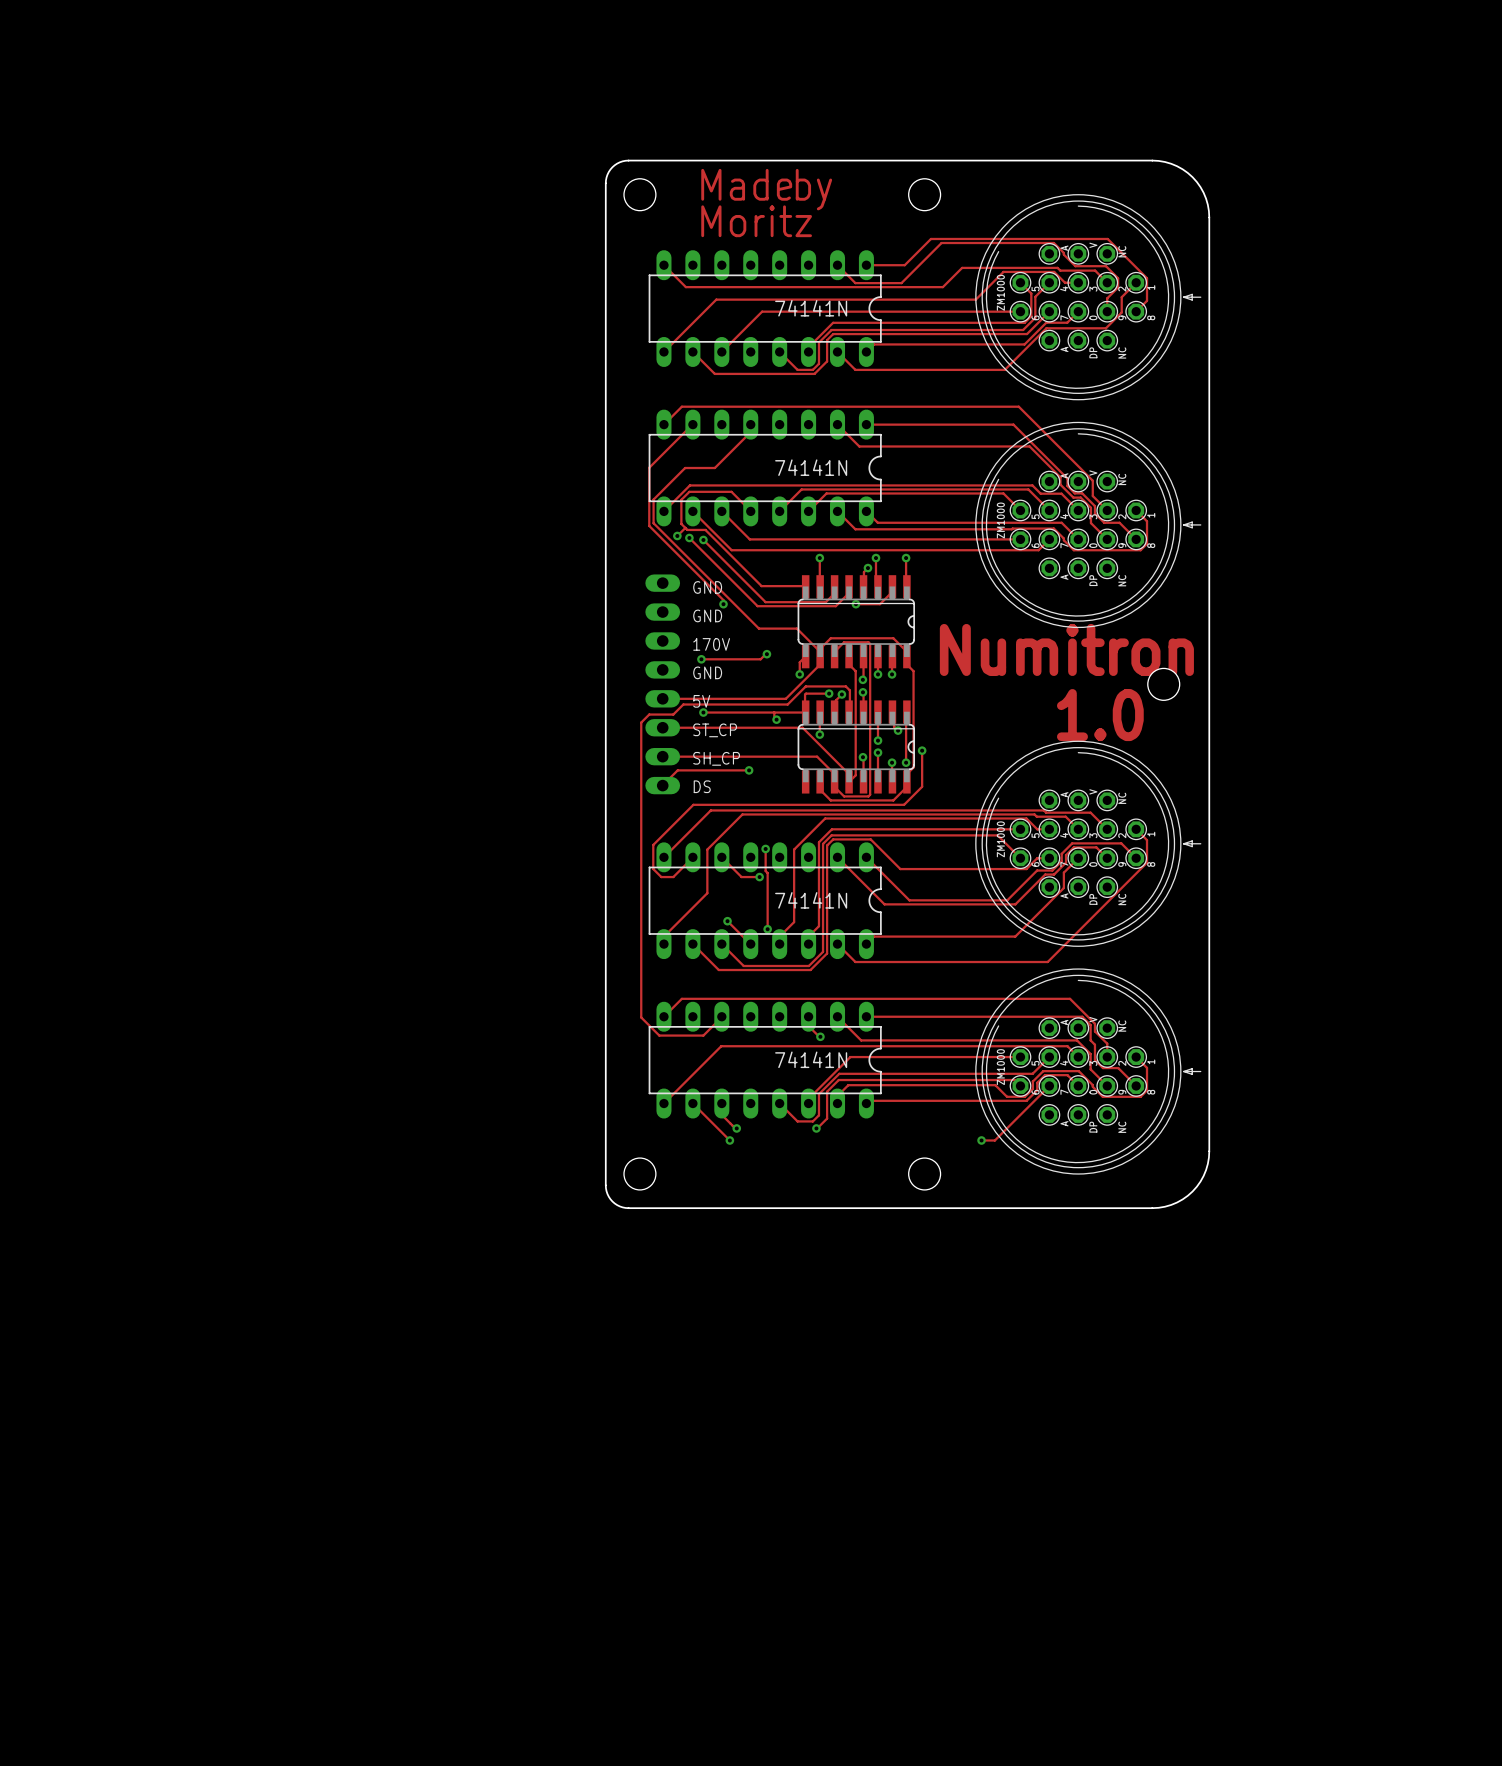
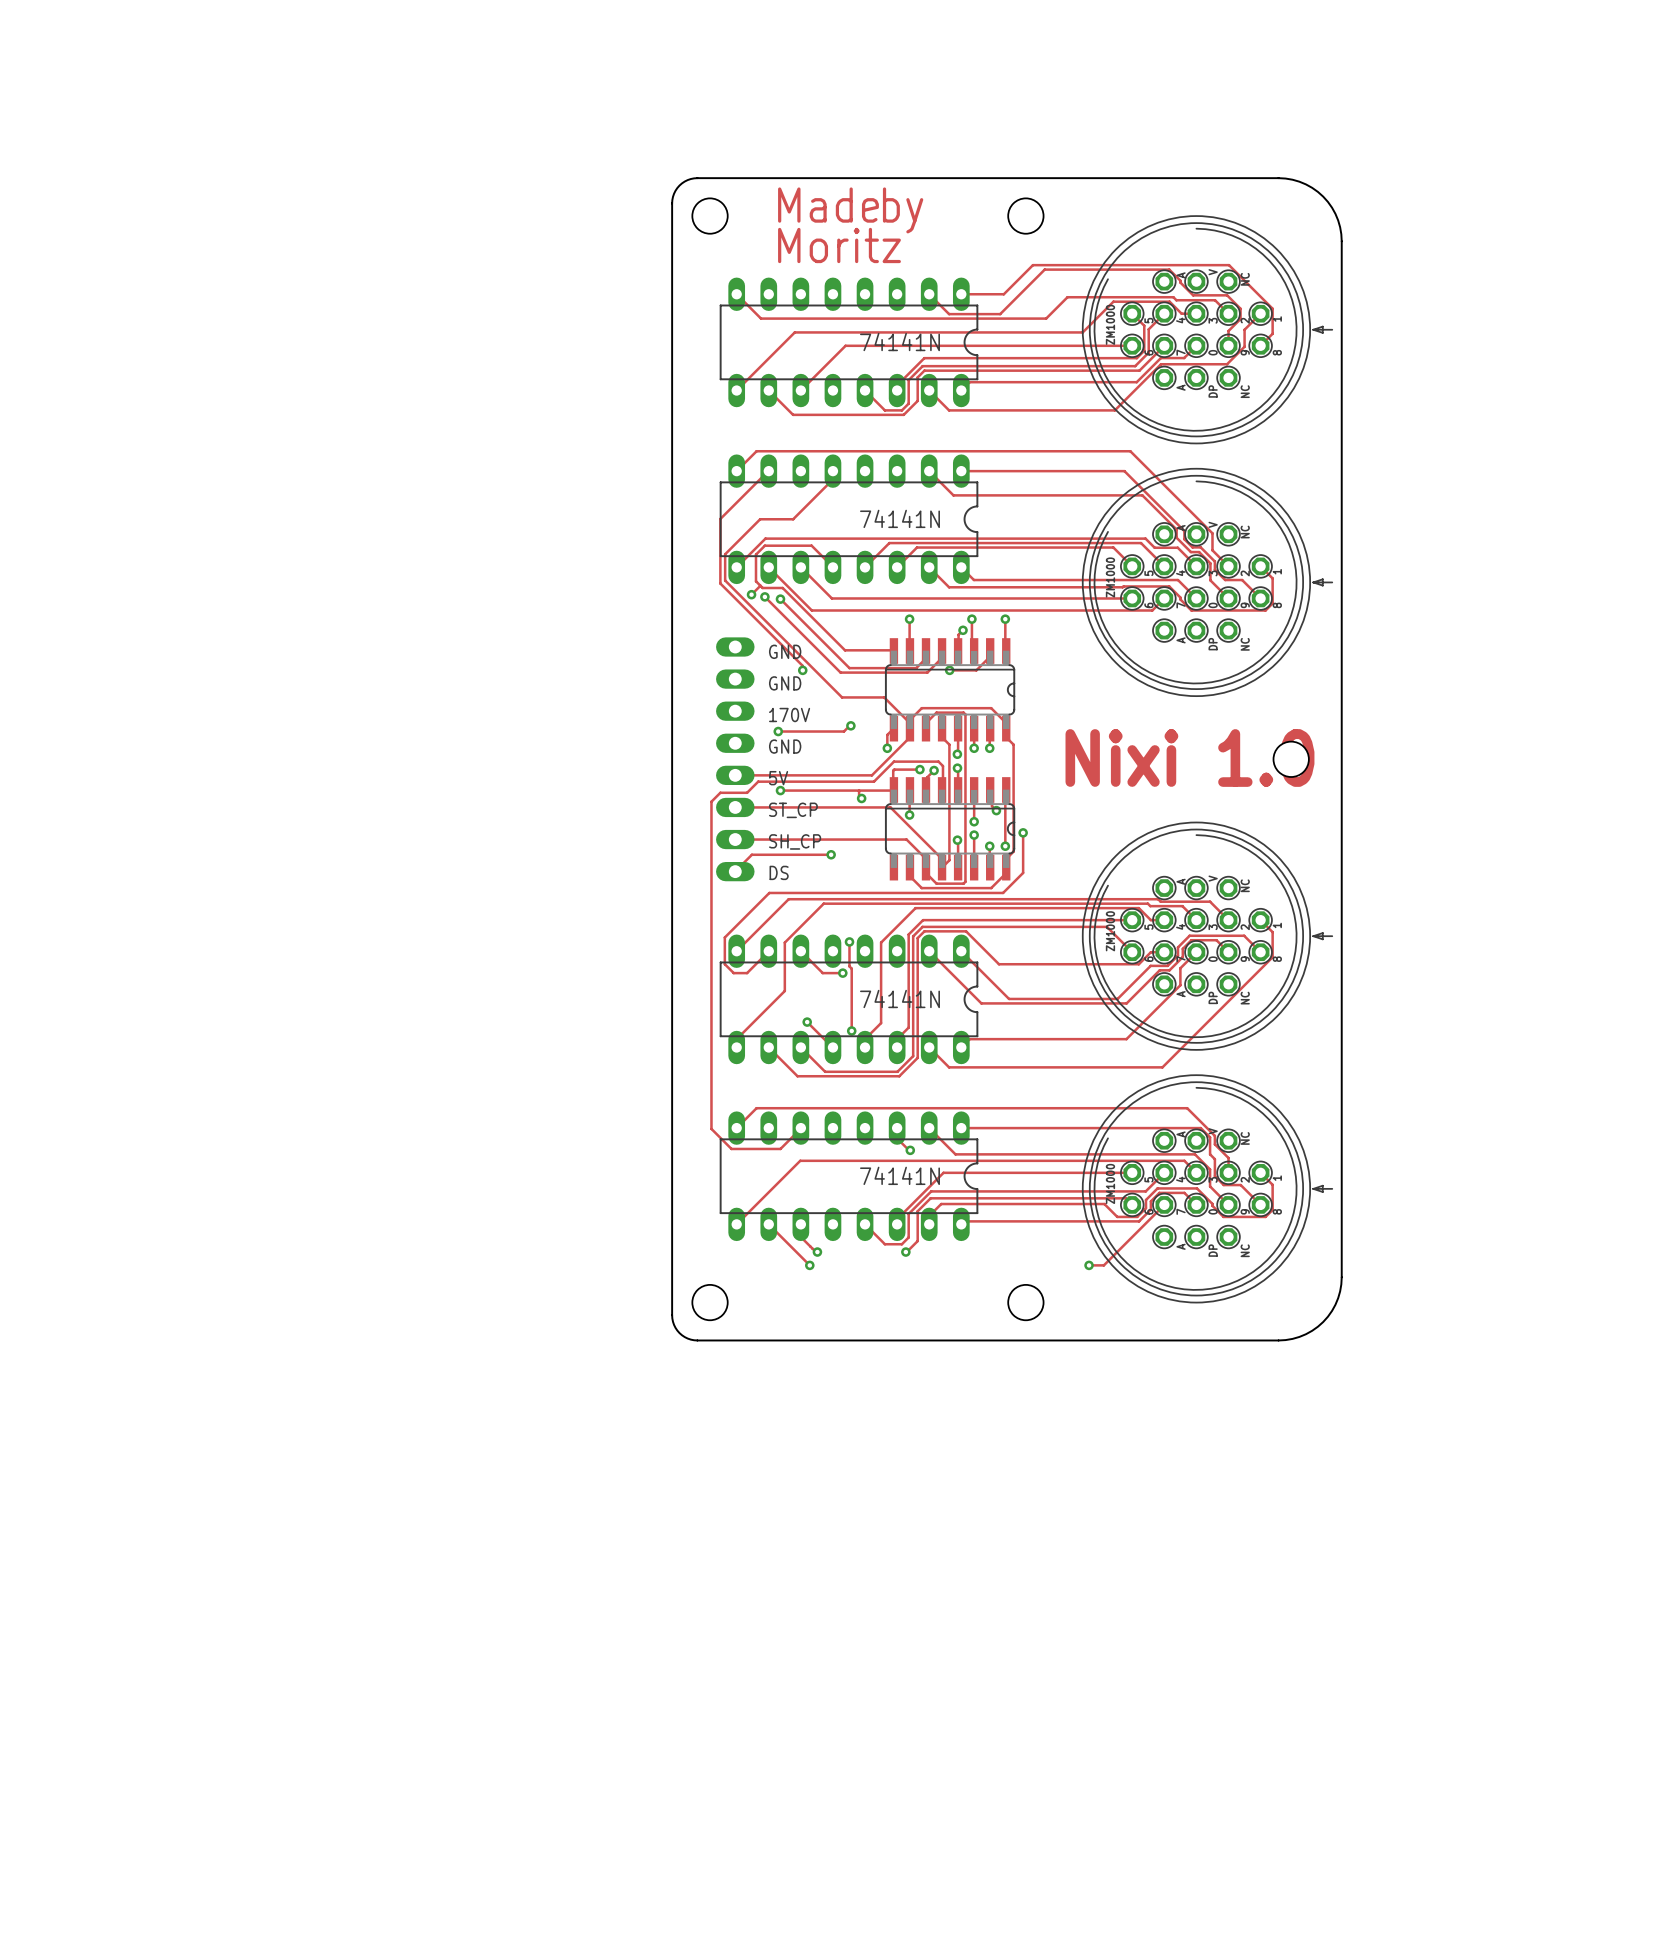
text: Numitron (1066, 649) -> none
text: none -> Nixi 1.0 (1189, 757)
text: 1.0 (1100, 715) -> none

